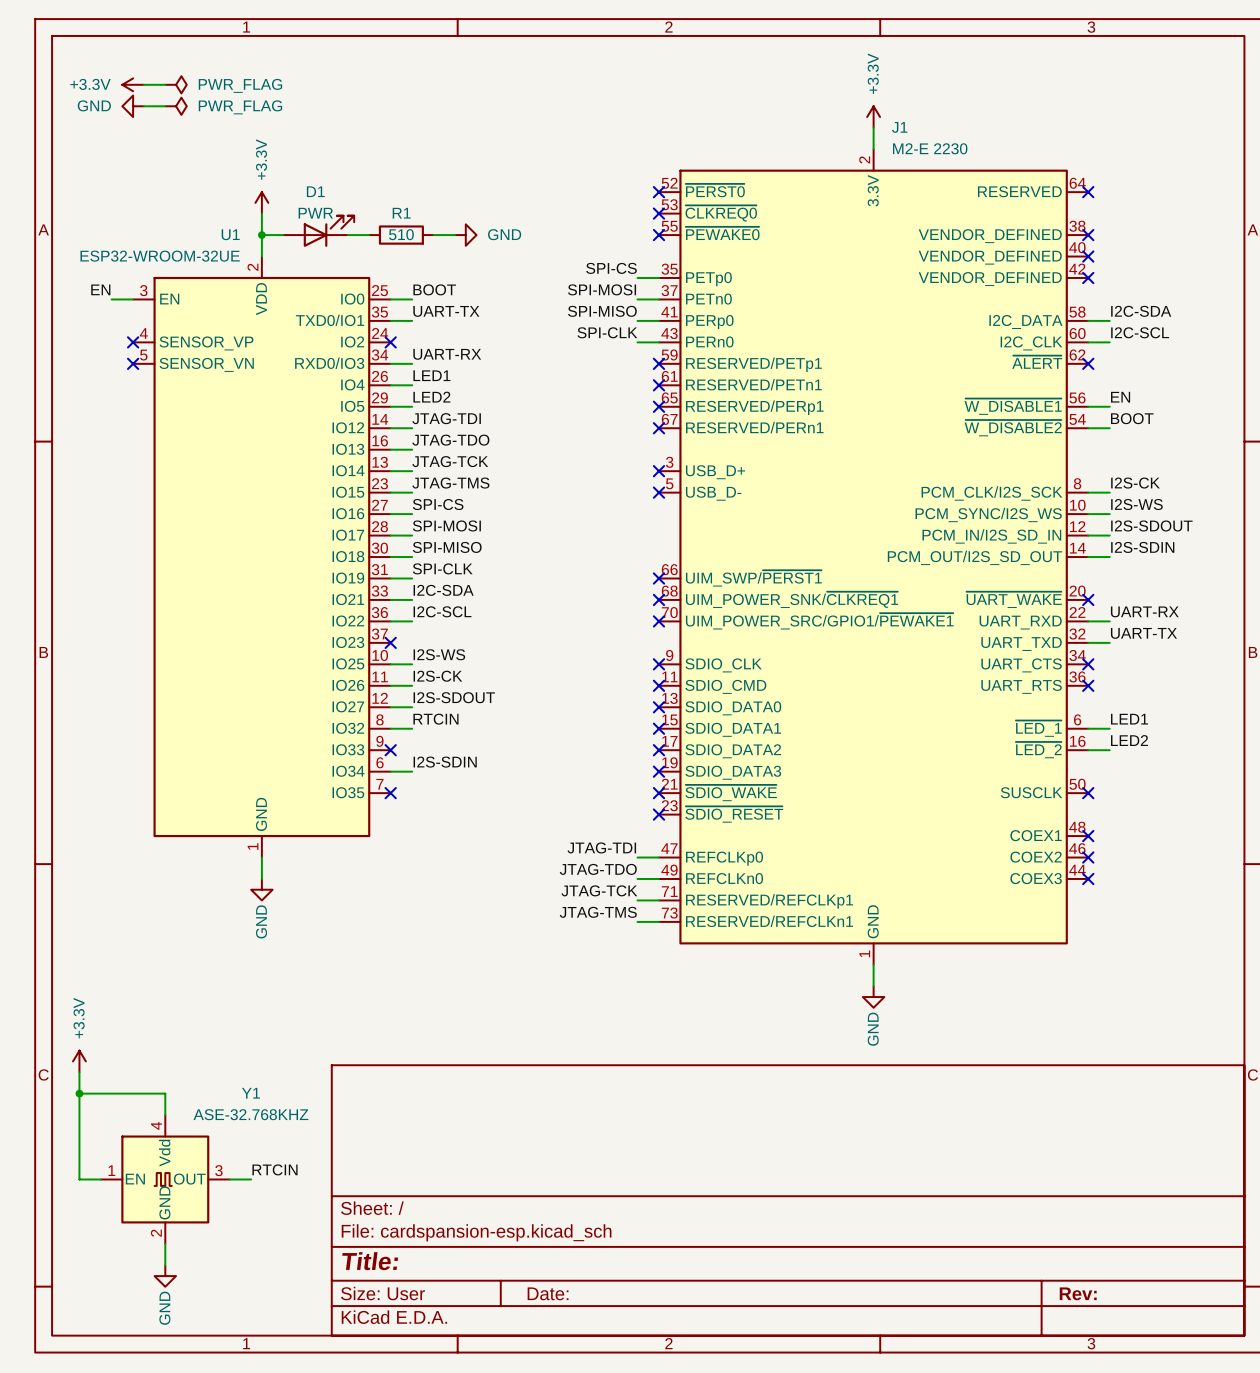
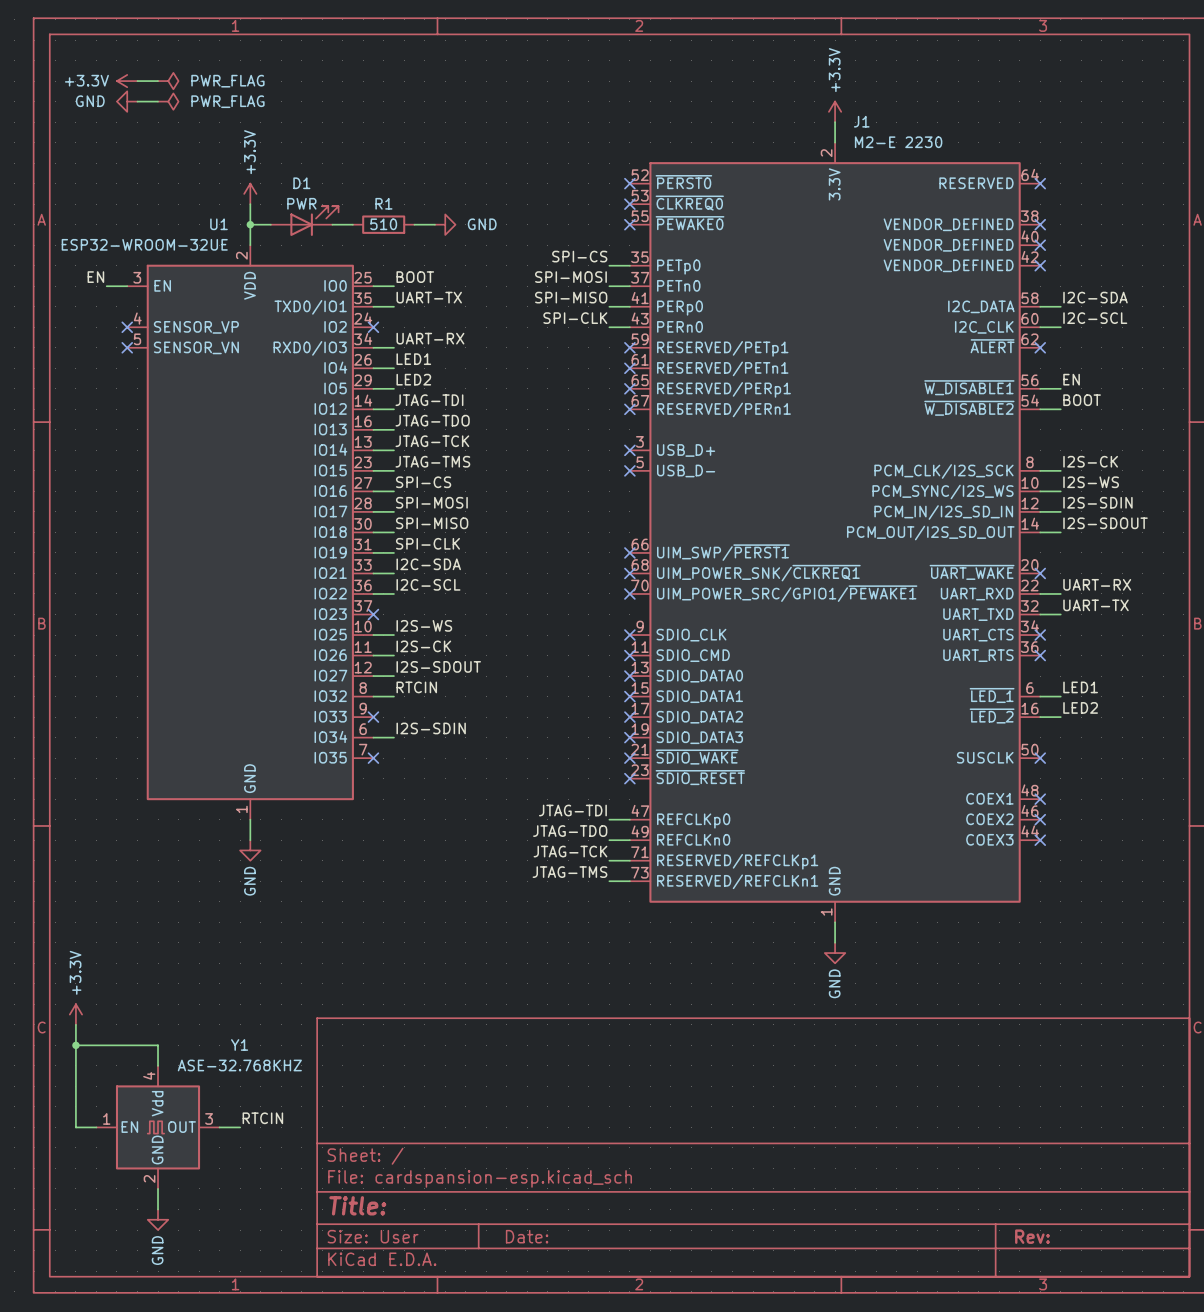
label: I2S-SDOUT (1151, 525) -> I2S-SDIN (1097, 502)
label: I2S-SDIN (1142, 547) -> I2S-SDOUT (1105, 523)

